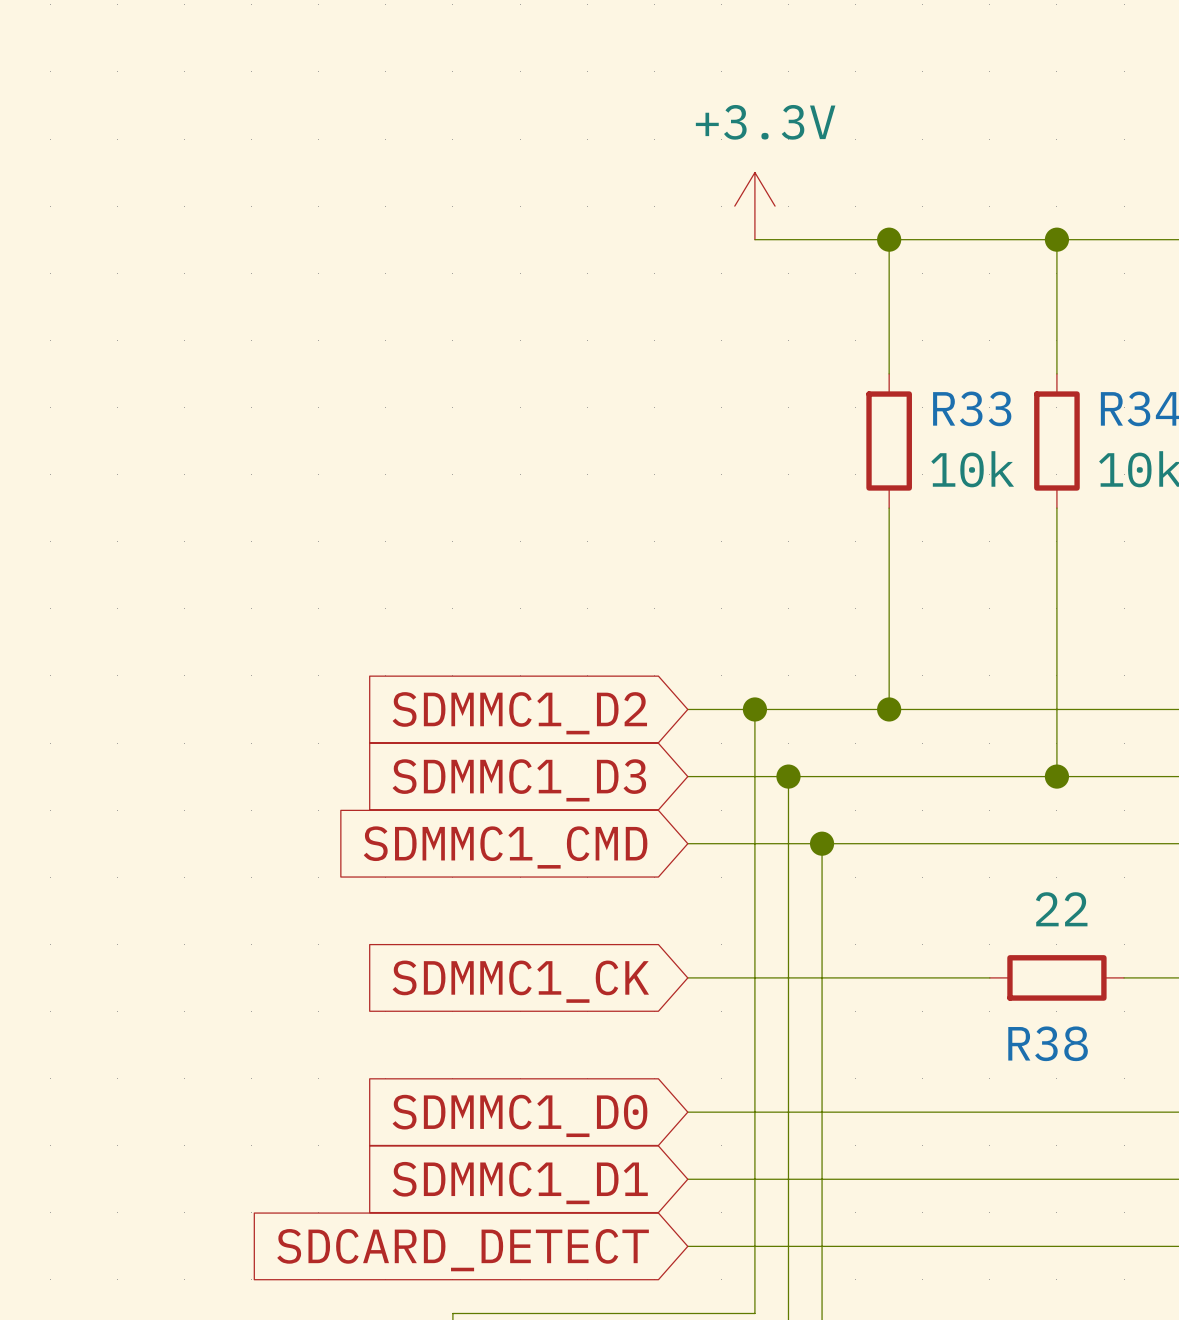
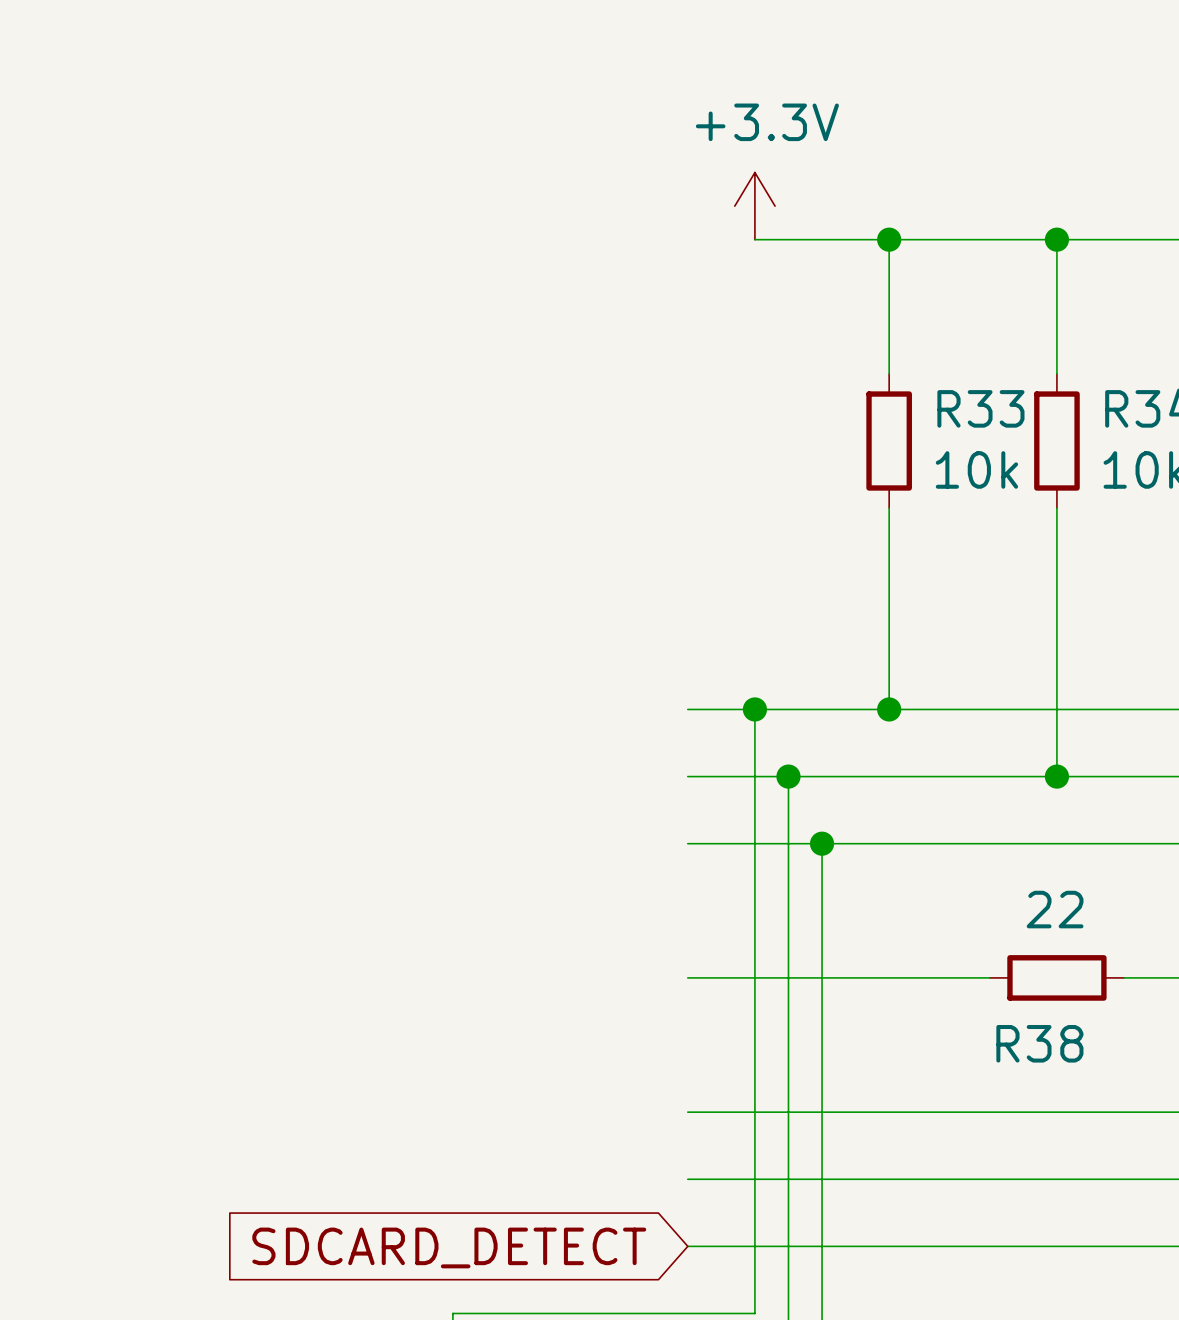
global label: SDMMC1_D2 (519, 713) -> none
global label: SDMMC1_D3 (519, 780) -> none
global label: SDMMC1_CMD (505, 847) -> none
global label: SDMMC1_CK (520, 981) -> none
global label: SDMMC1_D0 (519, 1115) -> none
global label: SDMMC1_D1 (520, 1183) -> none

